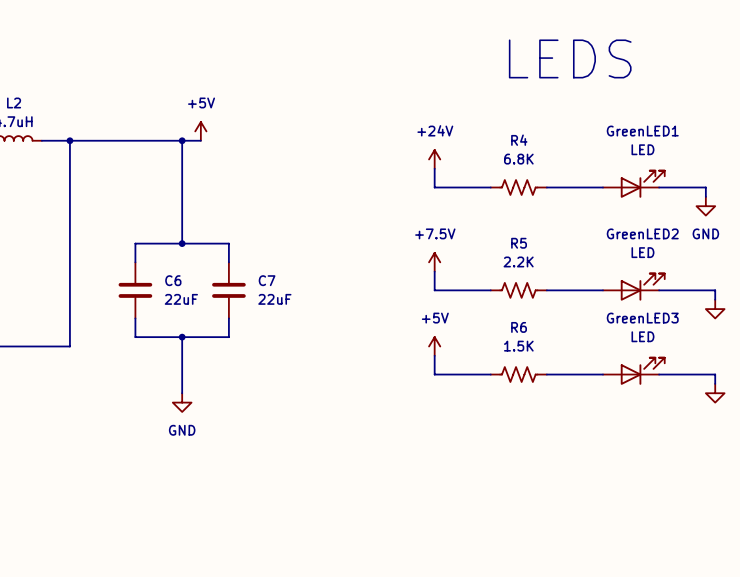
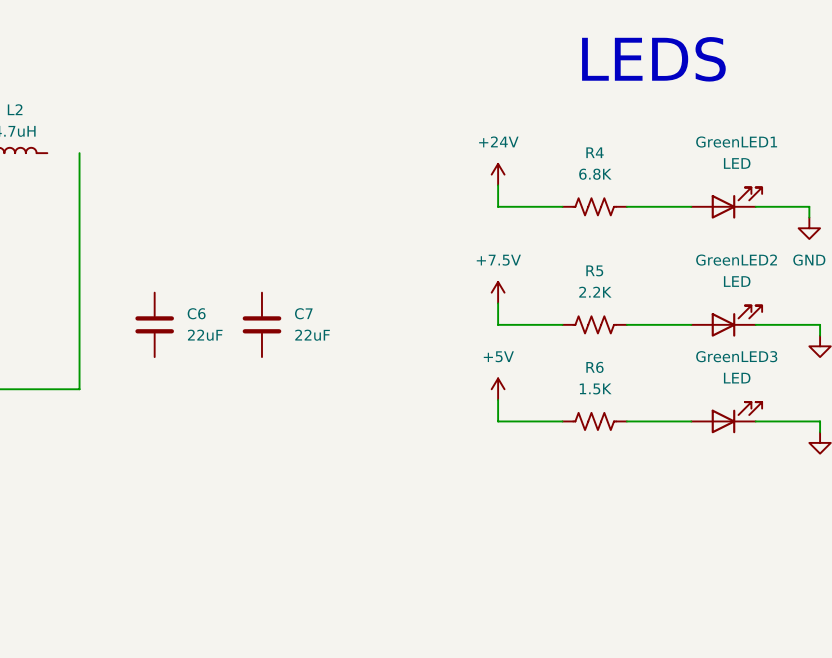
power symbol: +5V (200, 131) -> none
wire: (41, 140) (200, 140) -> none
junction: (69, 140) -> none
wire: (182, 140) (182, 243) -> none
junction: (182, 140) -> none
junction: (182, 243) -> none
wire: (135, 262) (135, 243) (228, 243) (228, 262) -> none
wire: (135, 318) (135, 337) (228, 337) (228, 318) -> none
wire: (182, 337) (182, 393) -> none
junction: (182, 337) -> none
power symbol: GND (182, 402) -> none

